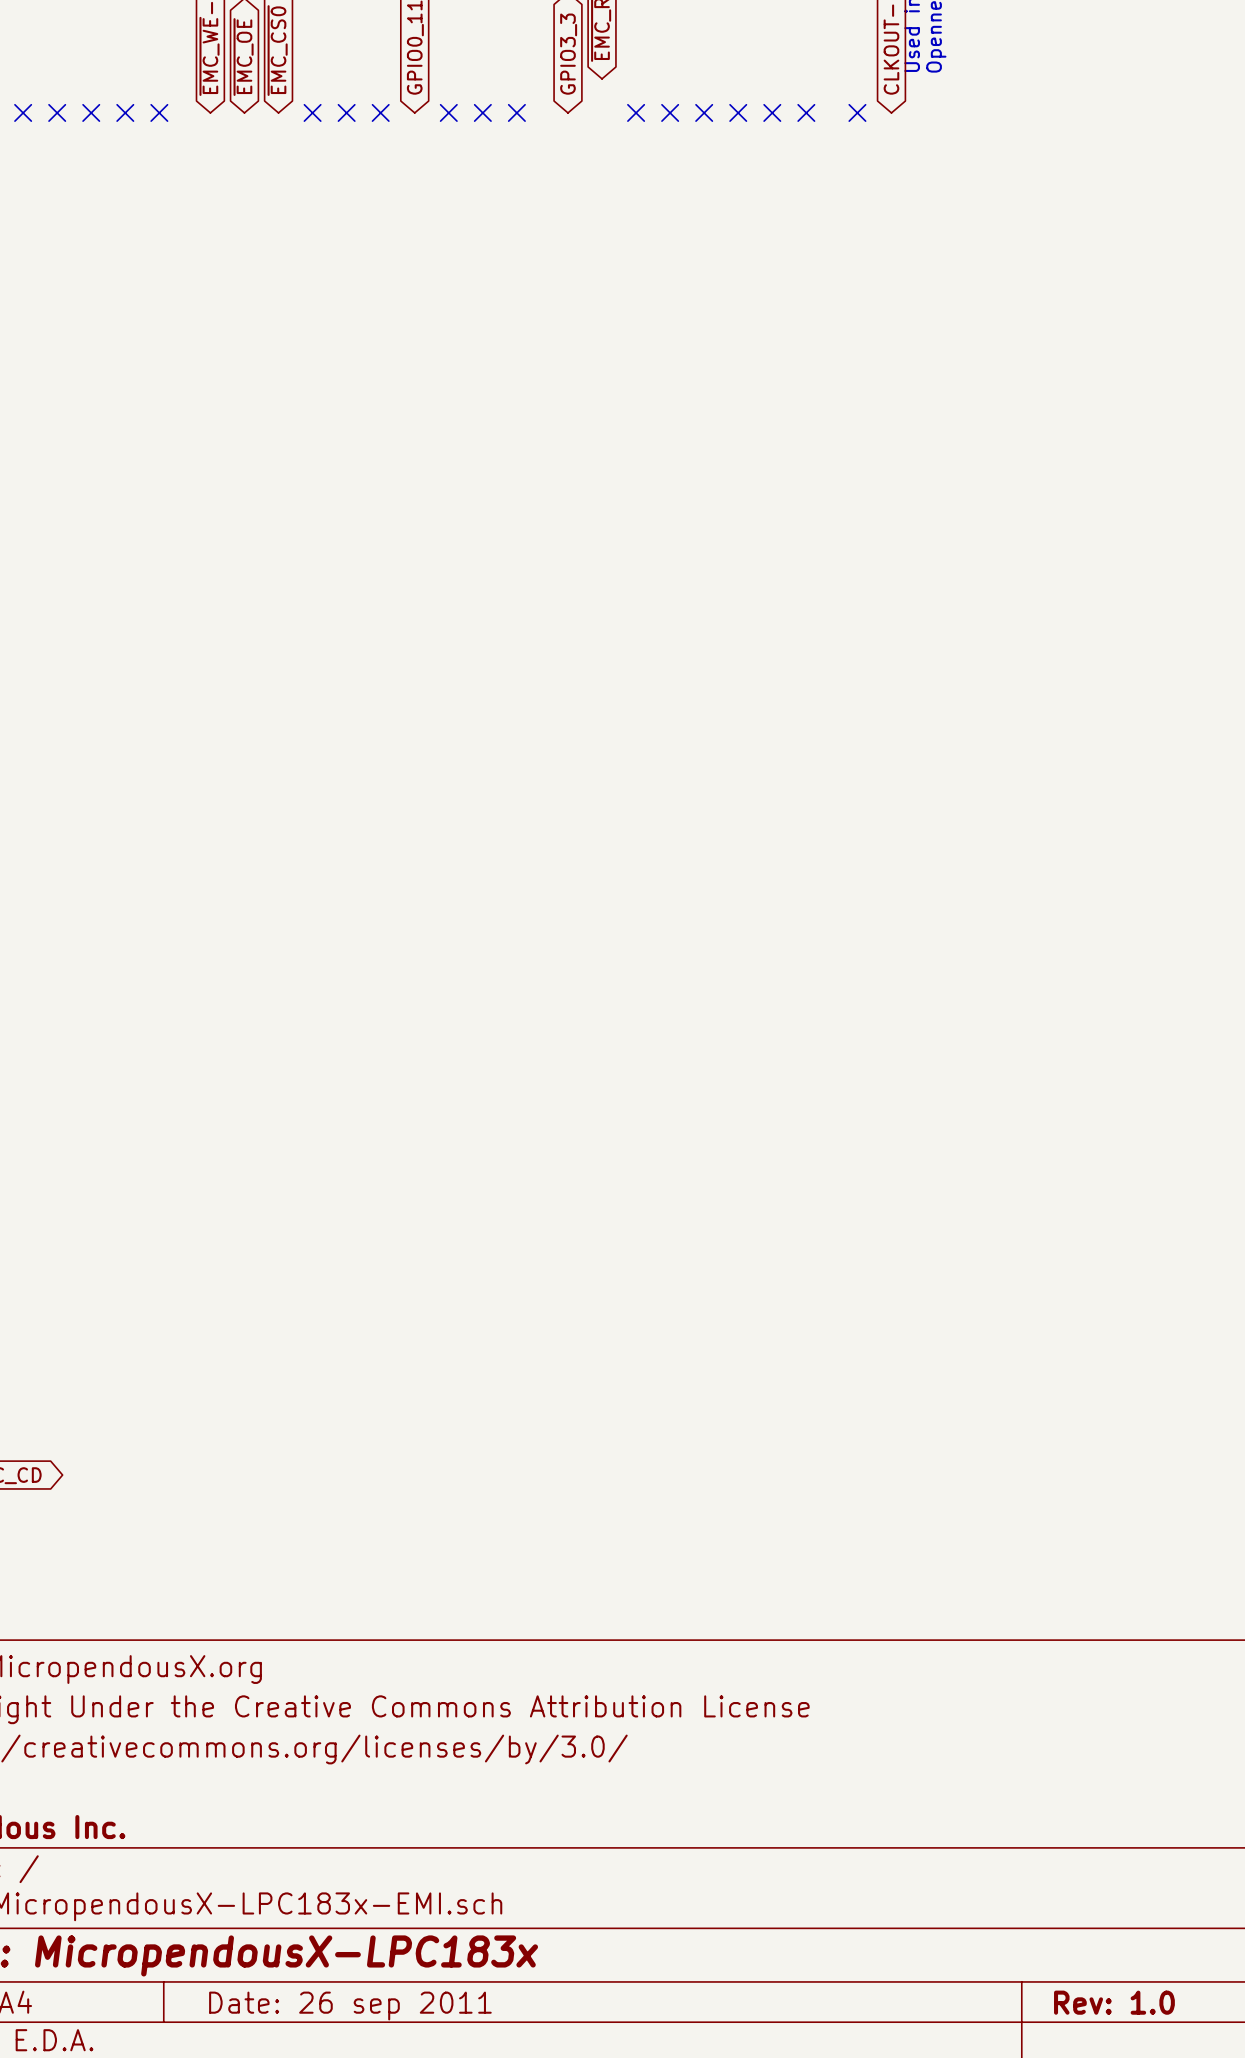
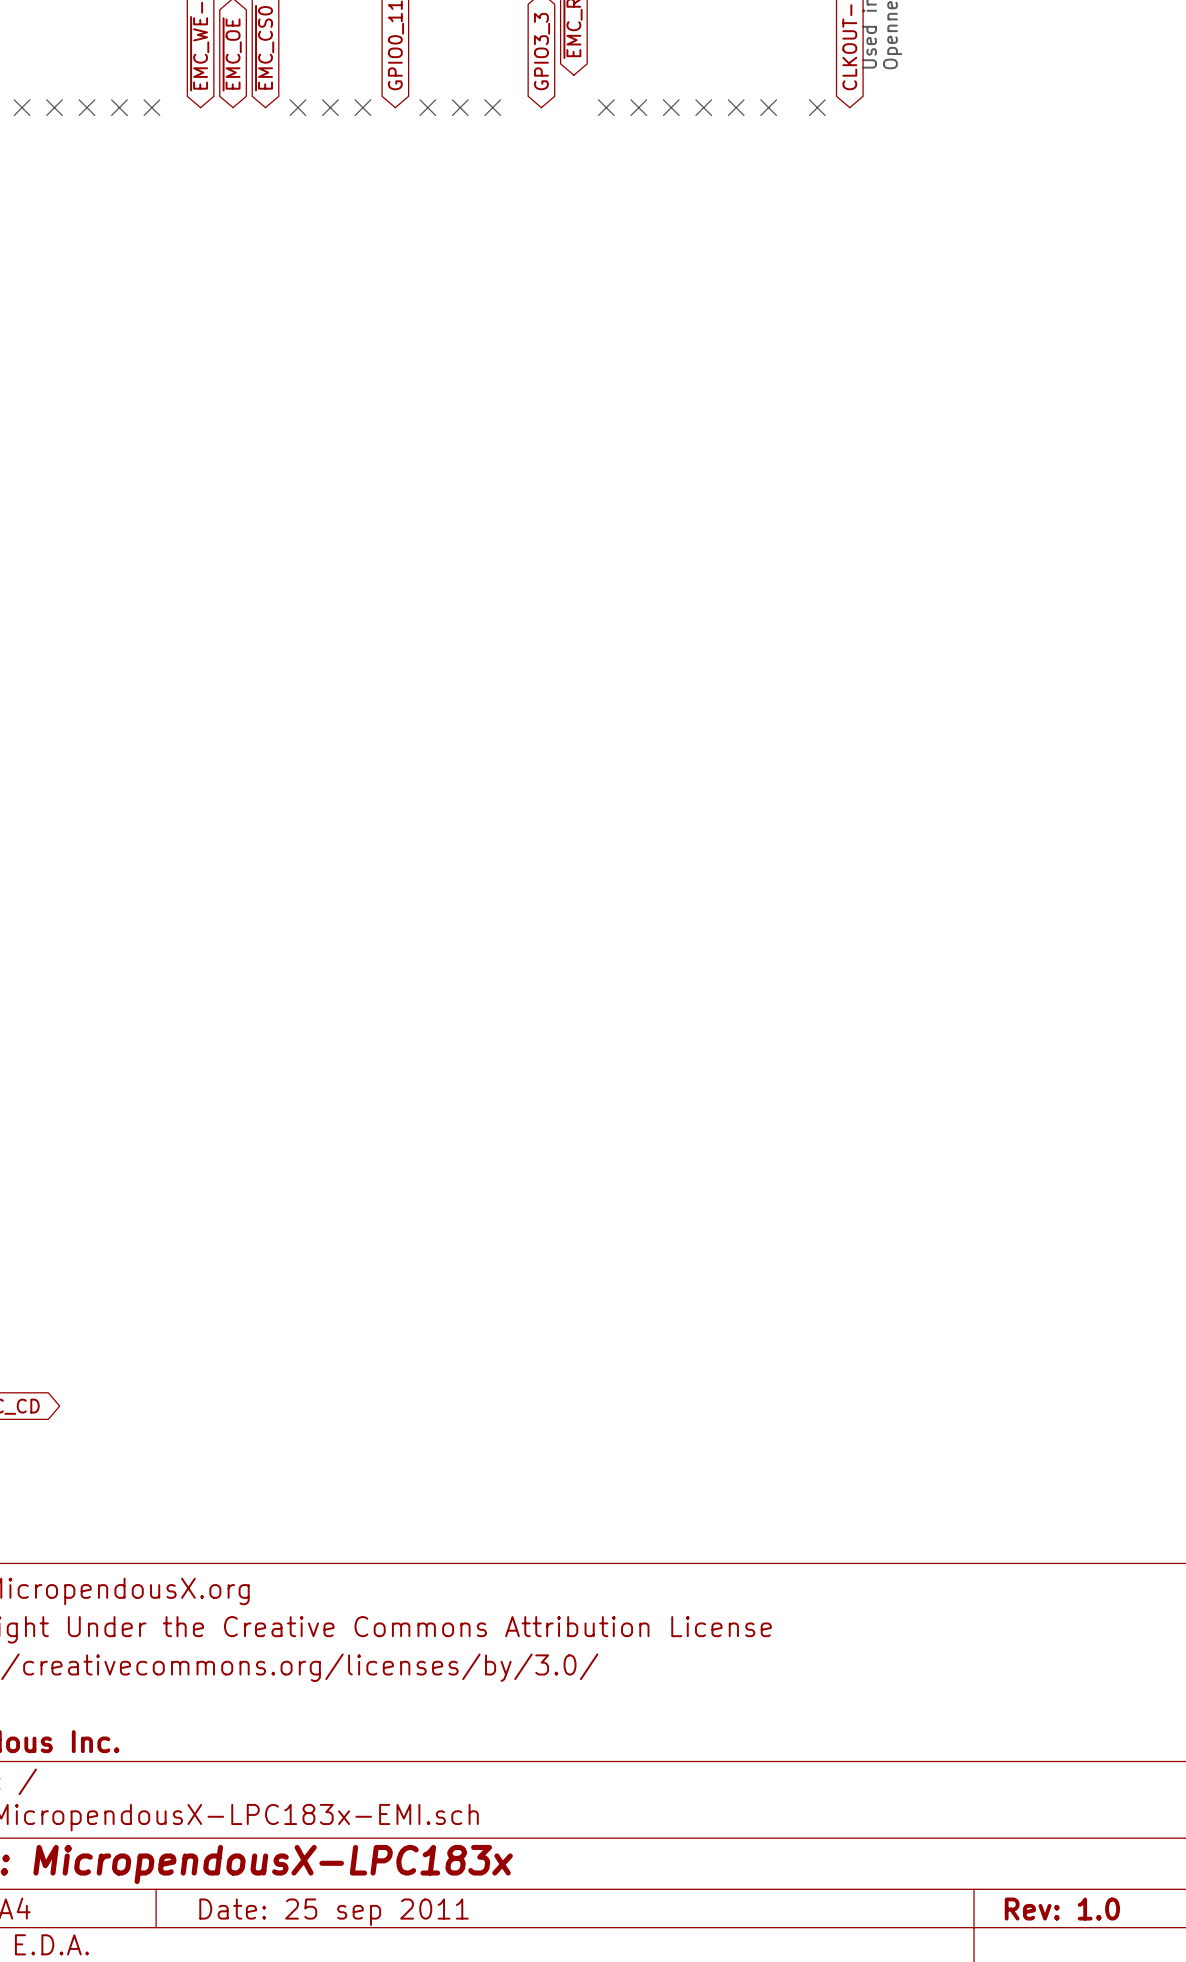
title block: Date: 26 sep 2011 (350, 2006) -> Date: 25 sep 2011 (334, 1912)

